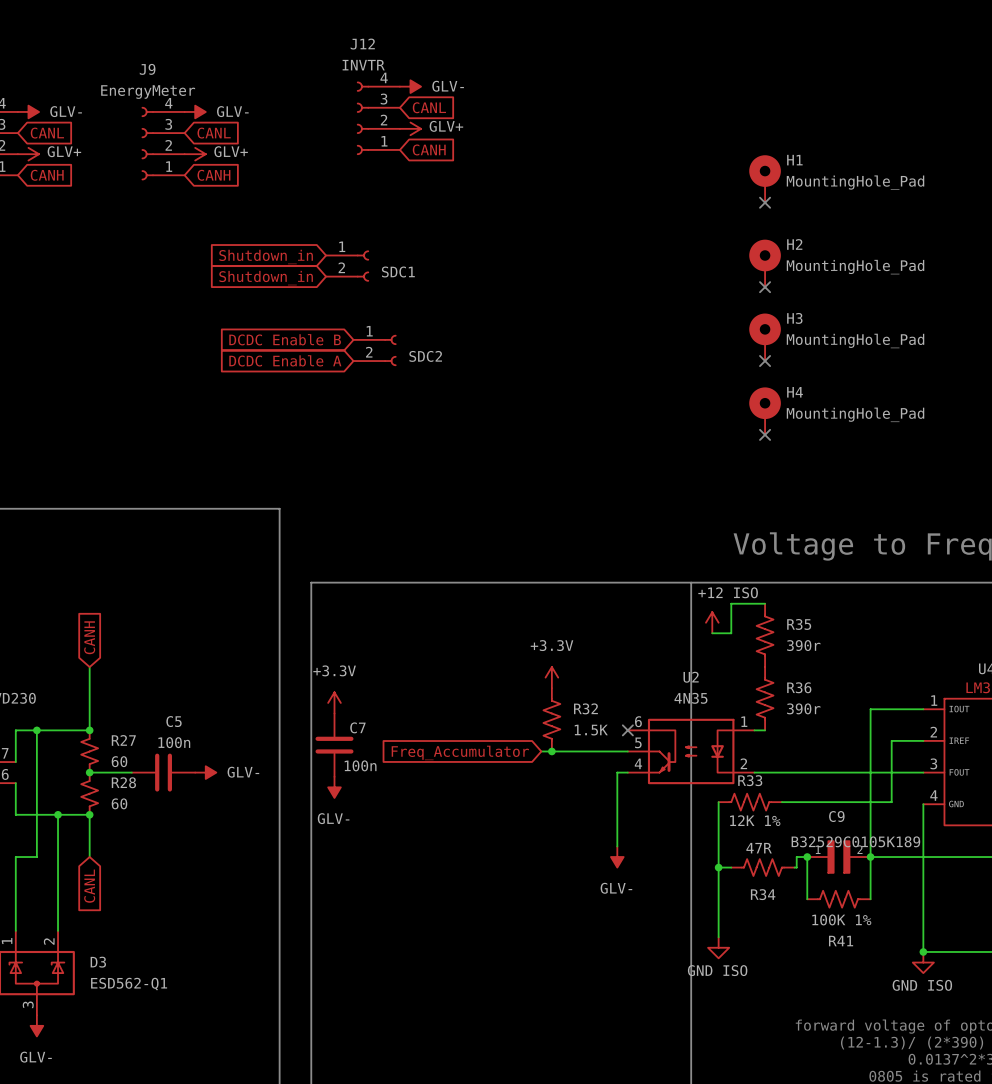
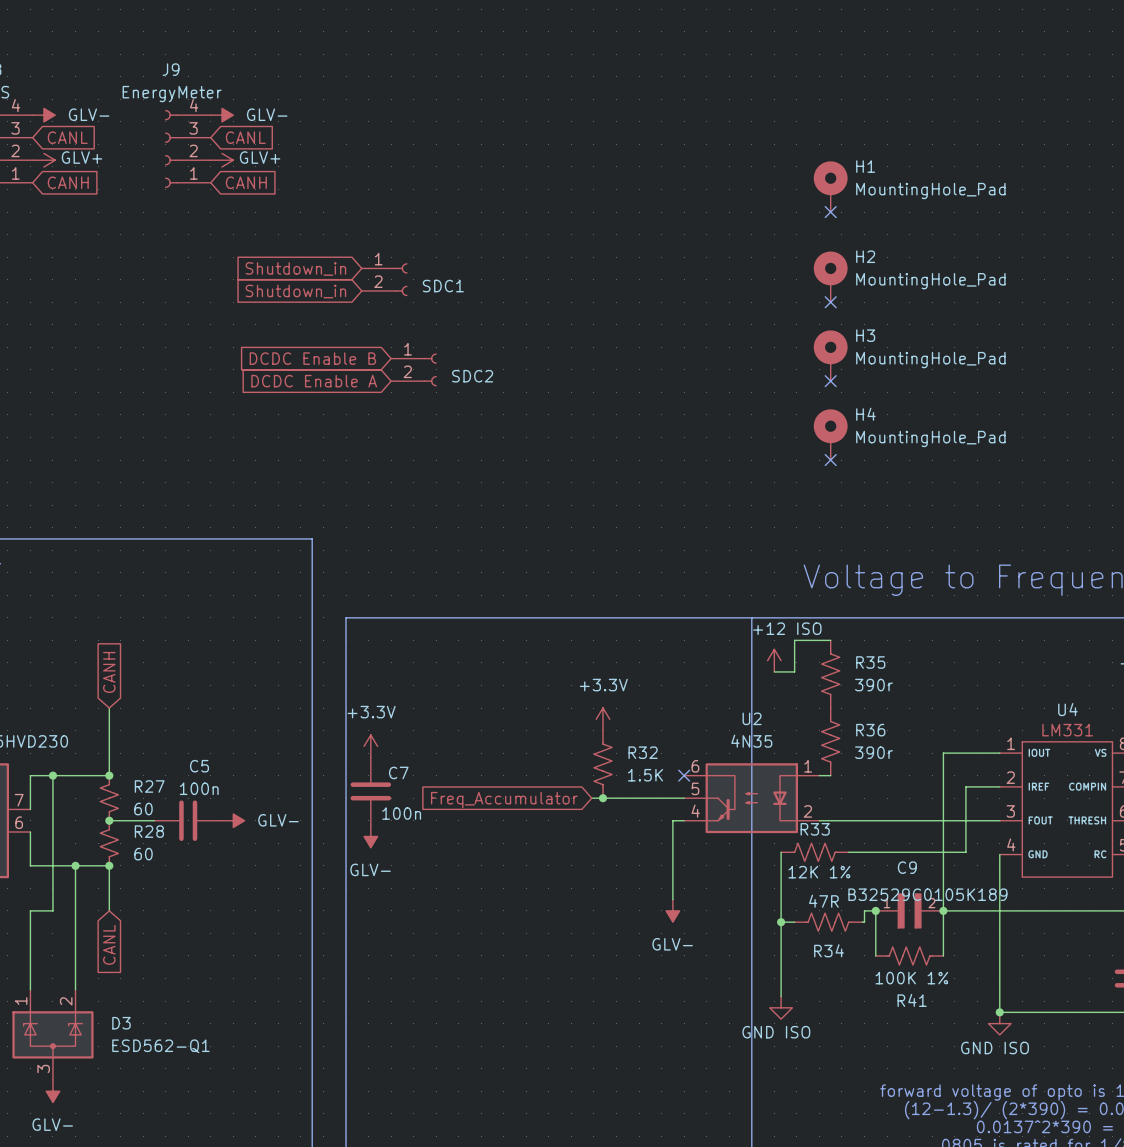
power symbol: GLV- (410, 86) -> none
global label: CANL (429, 107) -> none
J12: INVTR (378, 118) -> none
power symbol: GLV+ (410, 128) -> none
global label: CANH (429, 149) -> none

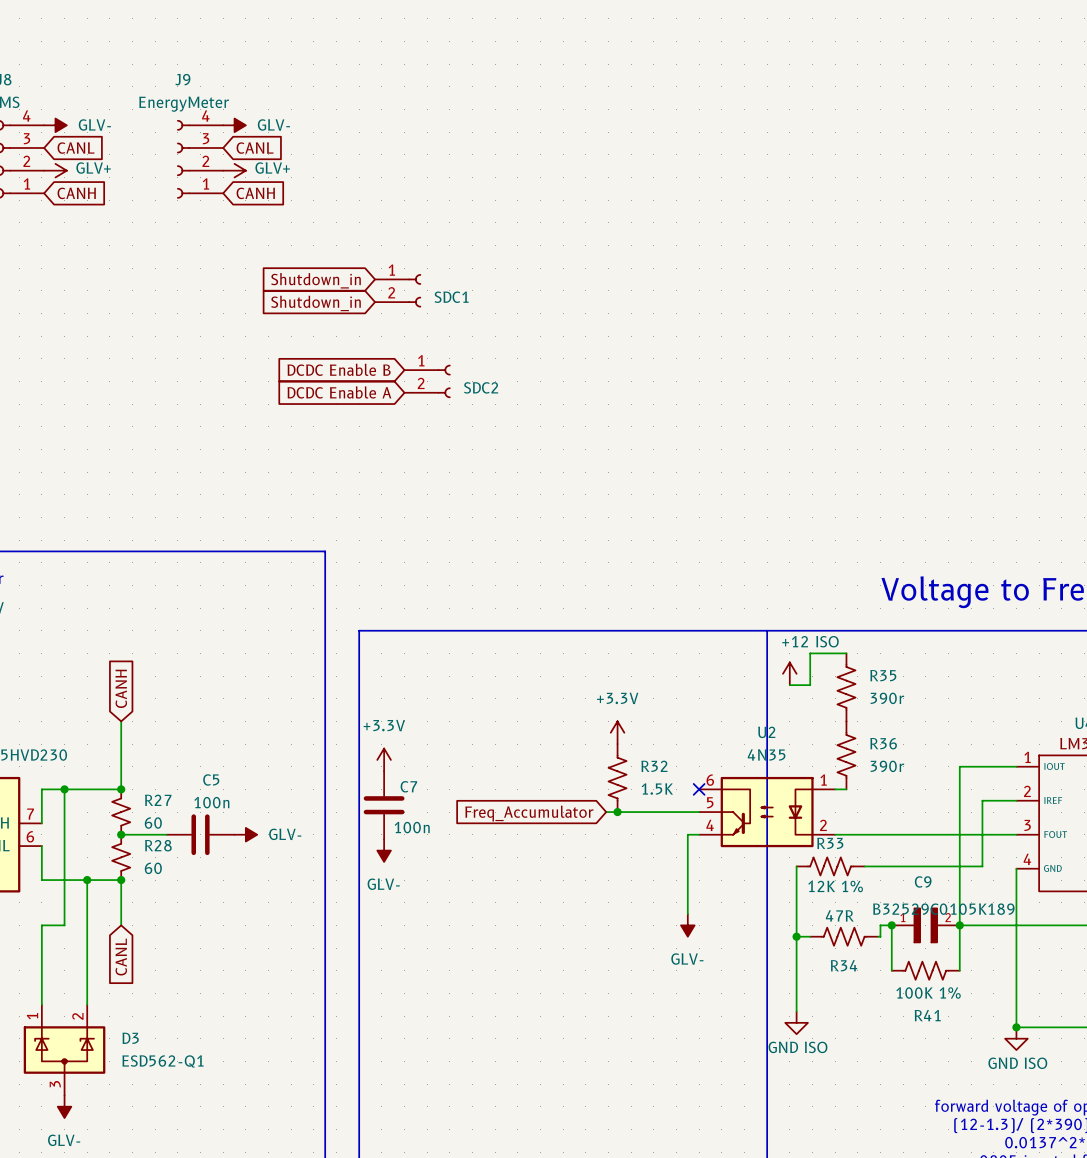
H1: MountingHole_Pad (830, 186) -> none
no-connect mark: (830, 212) -> none
H2: MountingHole_Pad (830, 276) -> none
no-connect mark: (830, 302) -> none
H3: MountingHole_Pad (830, 355) -> none
no-connect mark: (830, 381) -> none
H4: MountingHole_Pad (830, 434) -> none
no-connect mark: (830, 460) -> none

